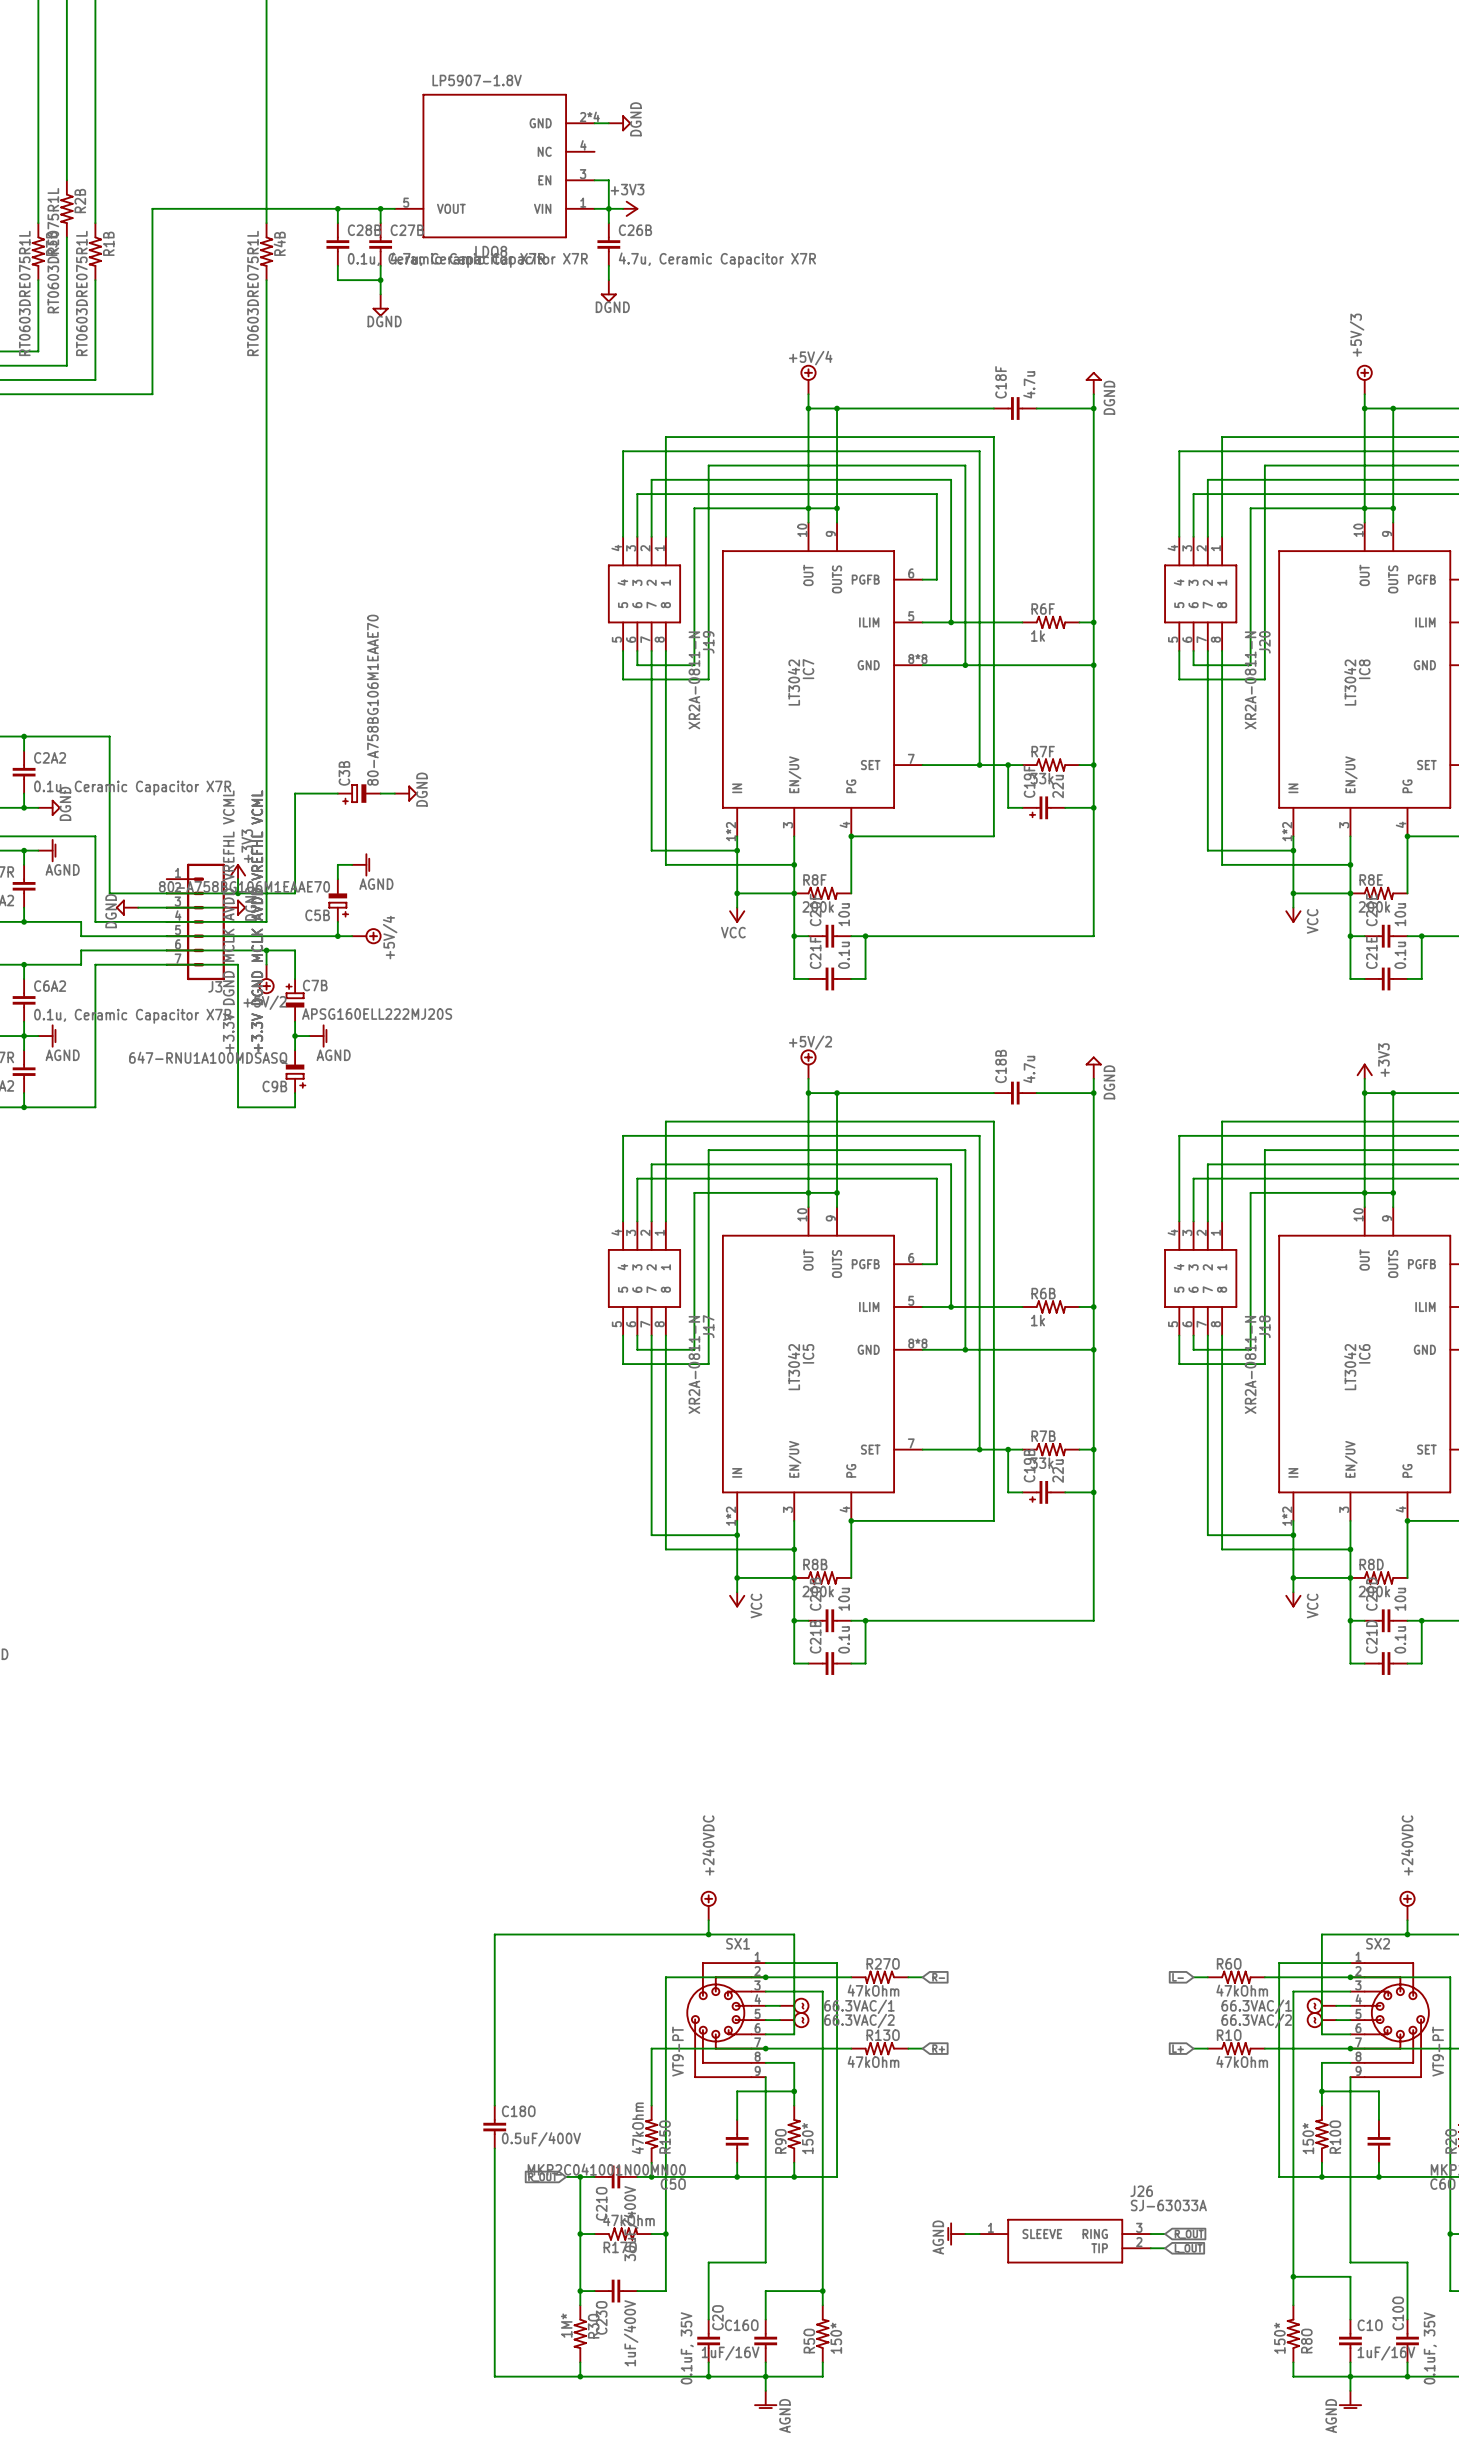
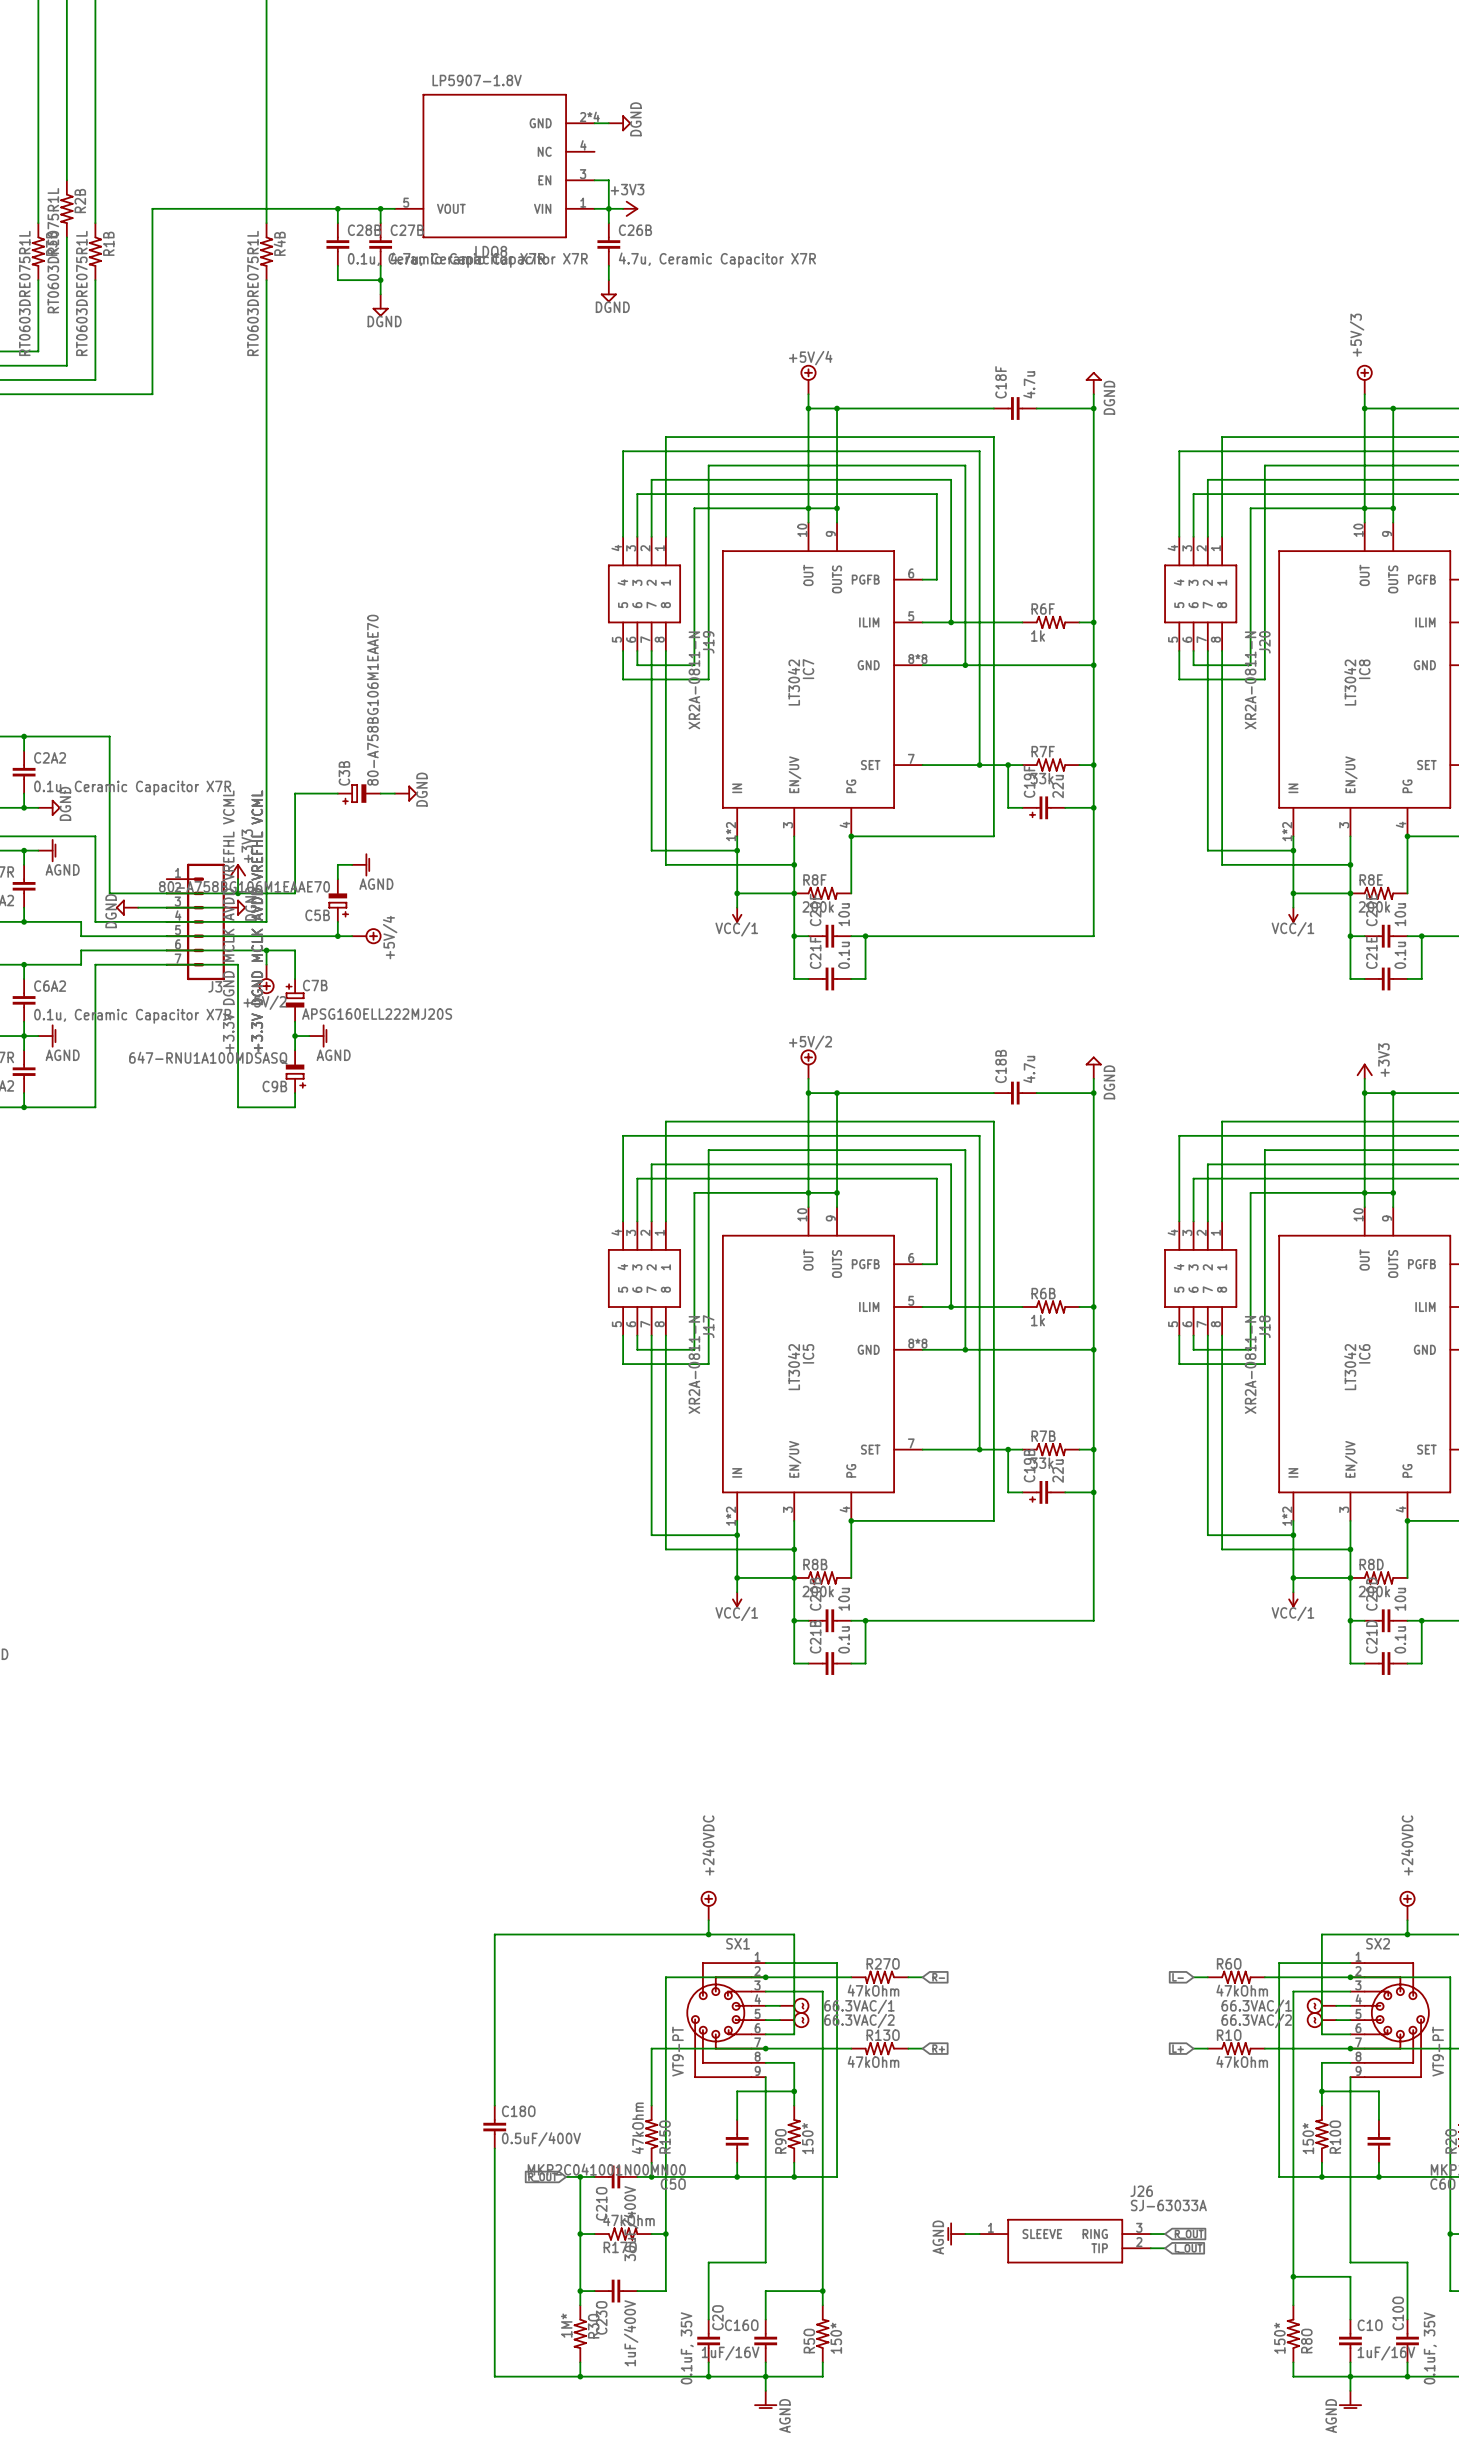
power symbol: VCC (737, 915) -> VCC/1 (737, 915)
power symbol: VCC (1293, 915) -> VCC/1 (1293, 915)
power symbol: VCC (737, 1599) -> VCC/1 (737, 1599)
power symbol: VCC (1293, 1599) -> VCC/1 (1293, 1599)

